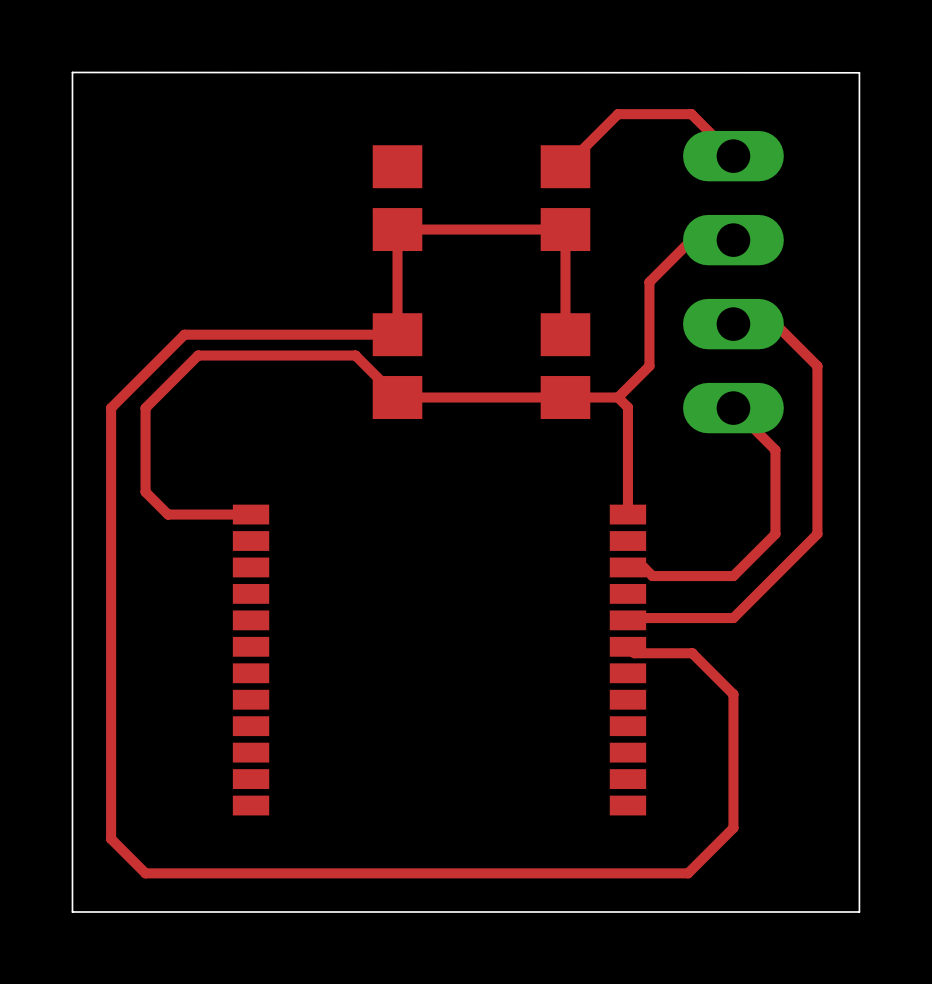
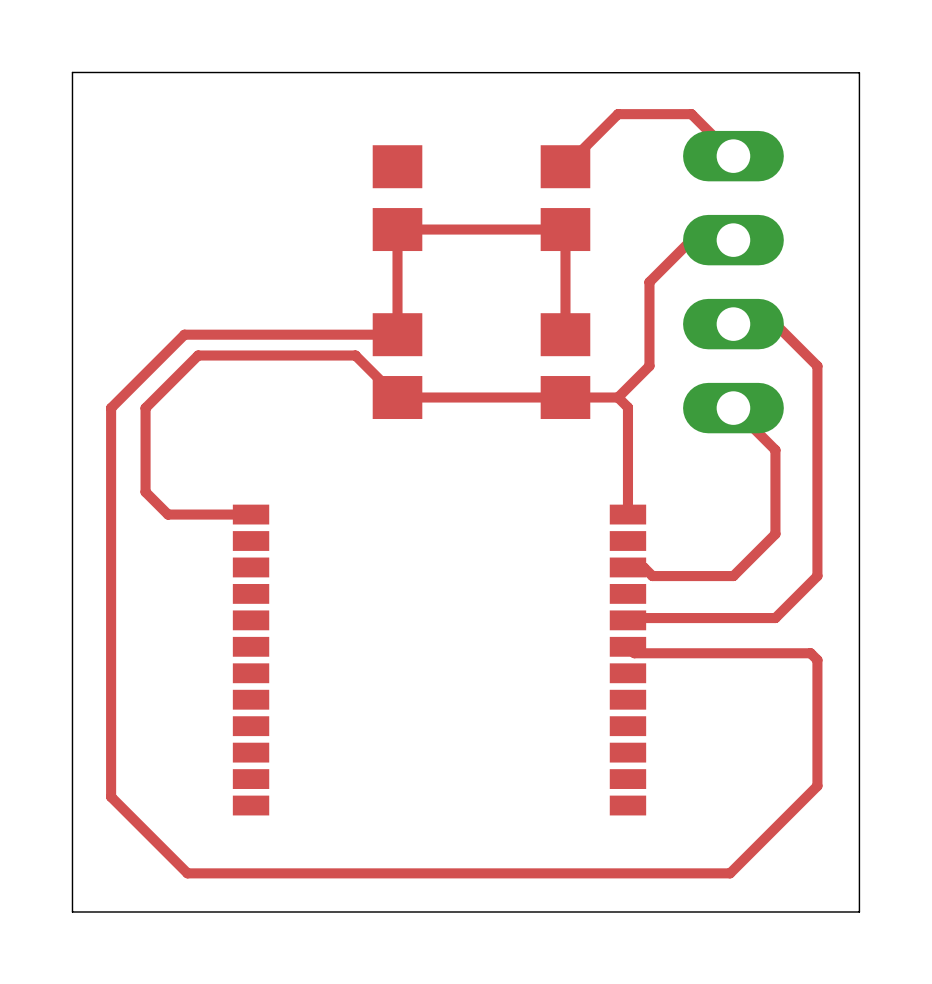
top track: (817, 534) (733, 618) -> (817, 534) (817, 576) (775, 618) (733, 618)
top track: (692, 653) (733, 694) (733, 828) (688, 873) -> (692, 653) (810, 653) (817, 660) (817, 786) (730, 873) (688, 873)
top track: (111, 796) (111, 838) (145, 873) (187, 873) -> (111, 796) (187, 873)

